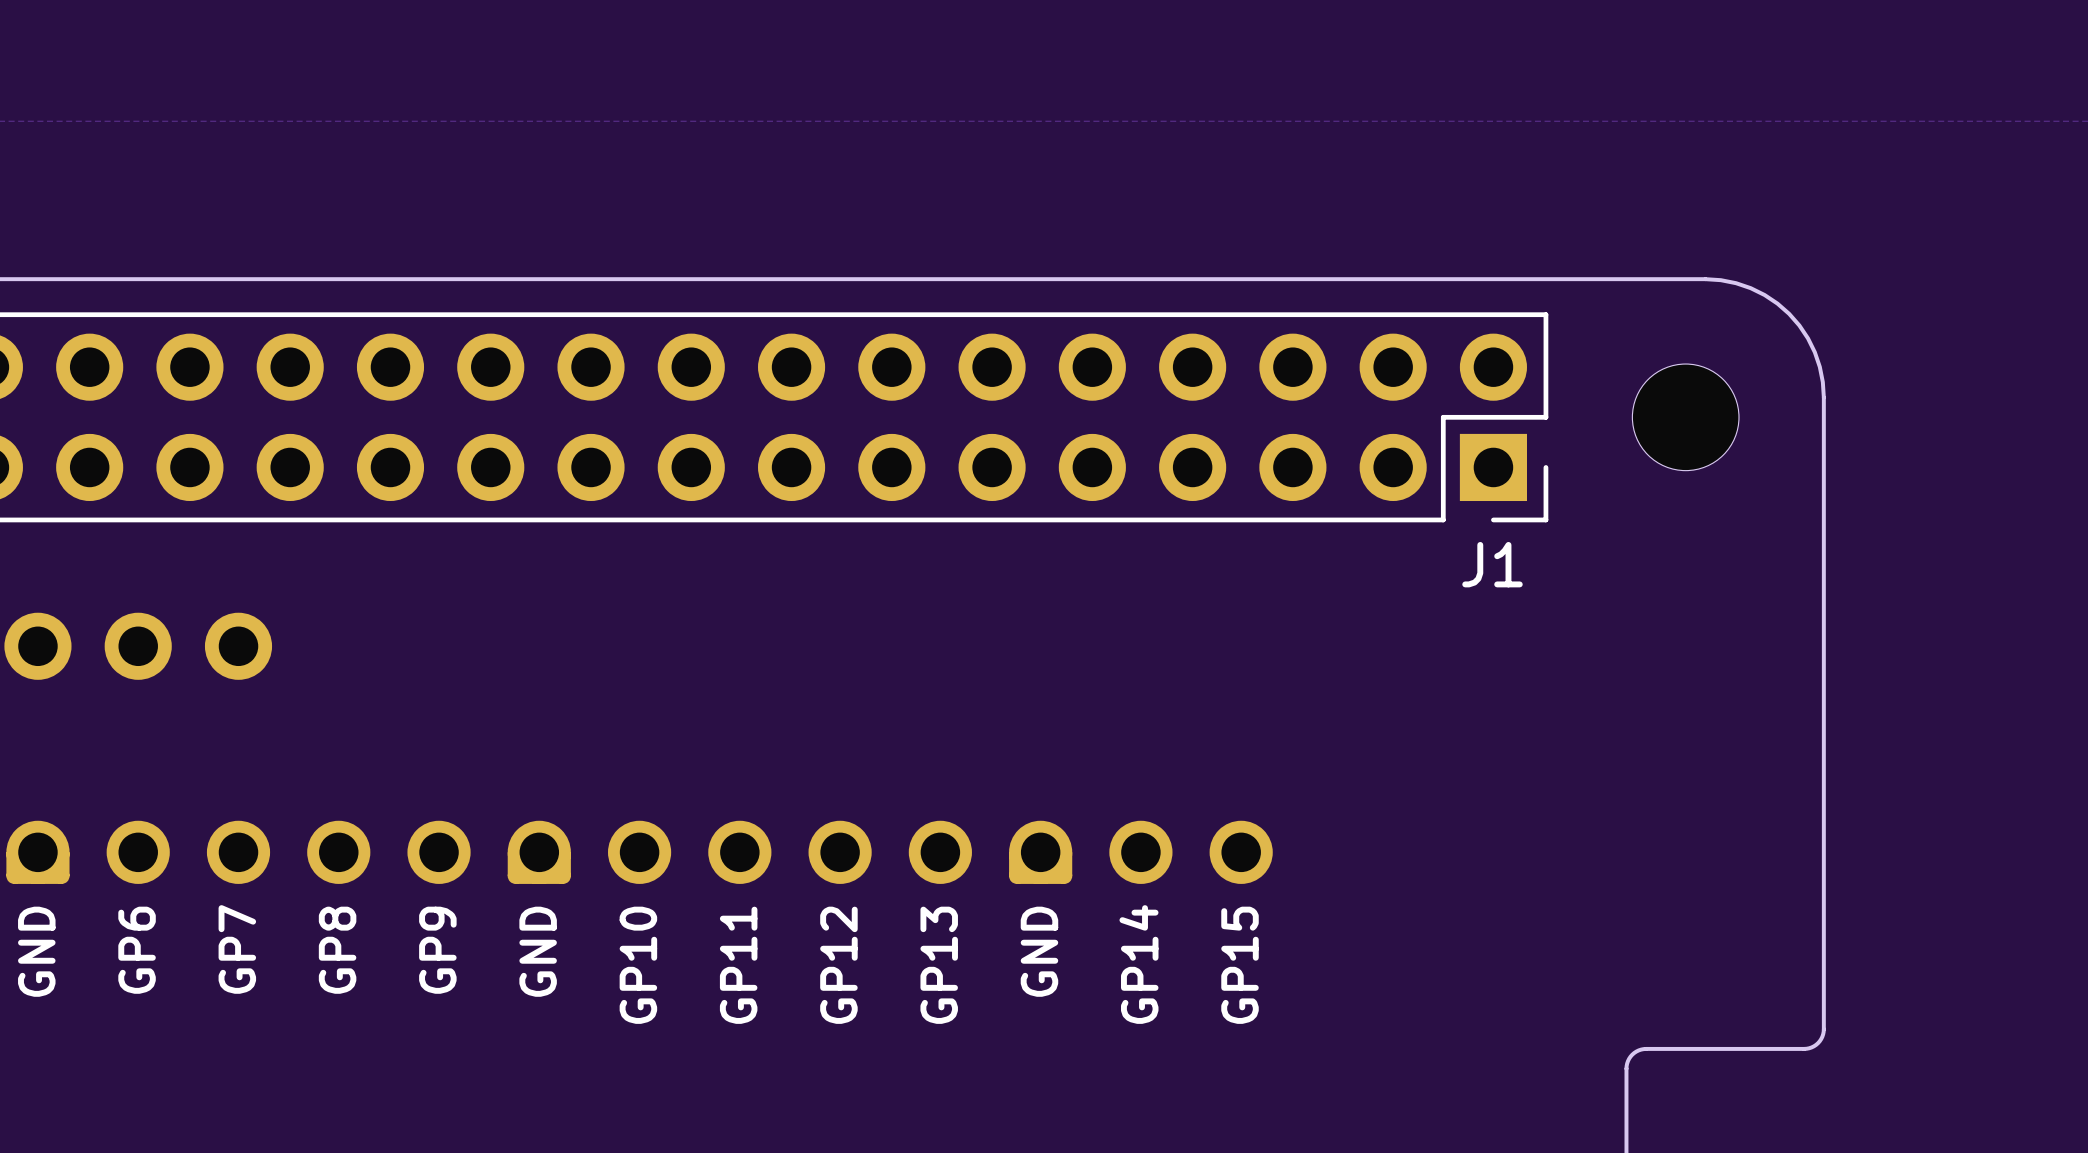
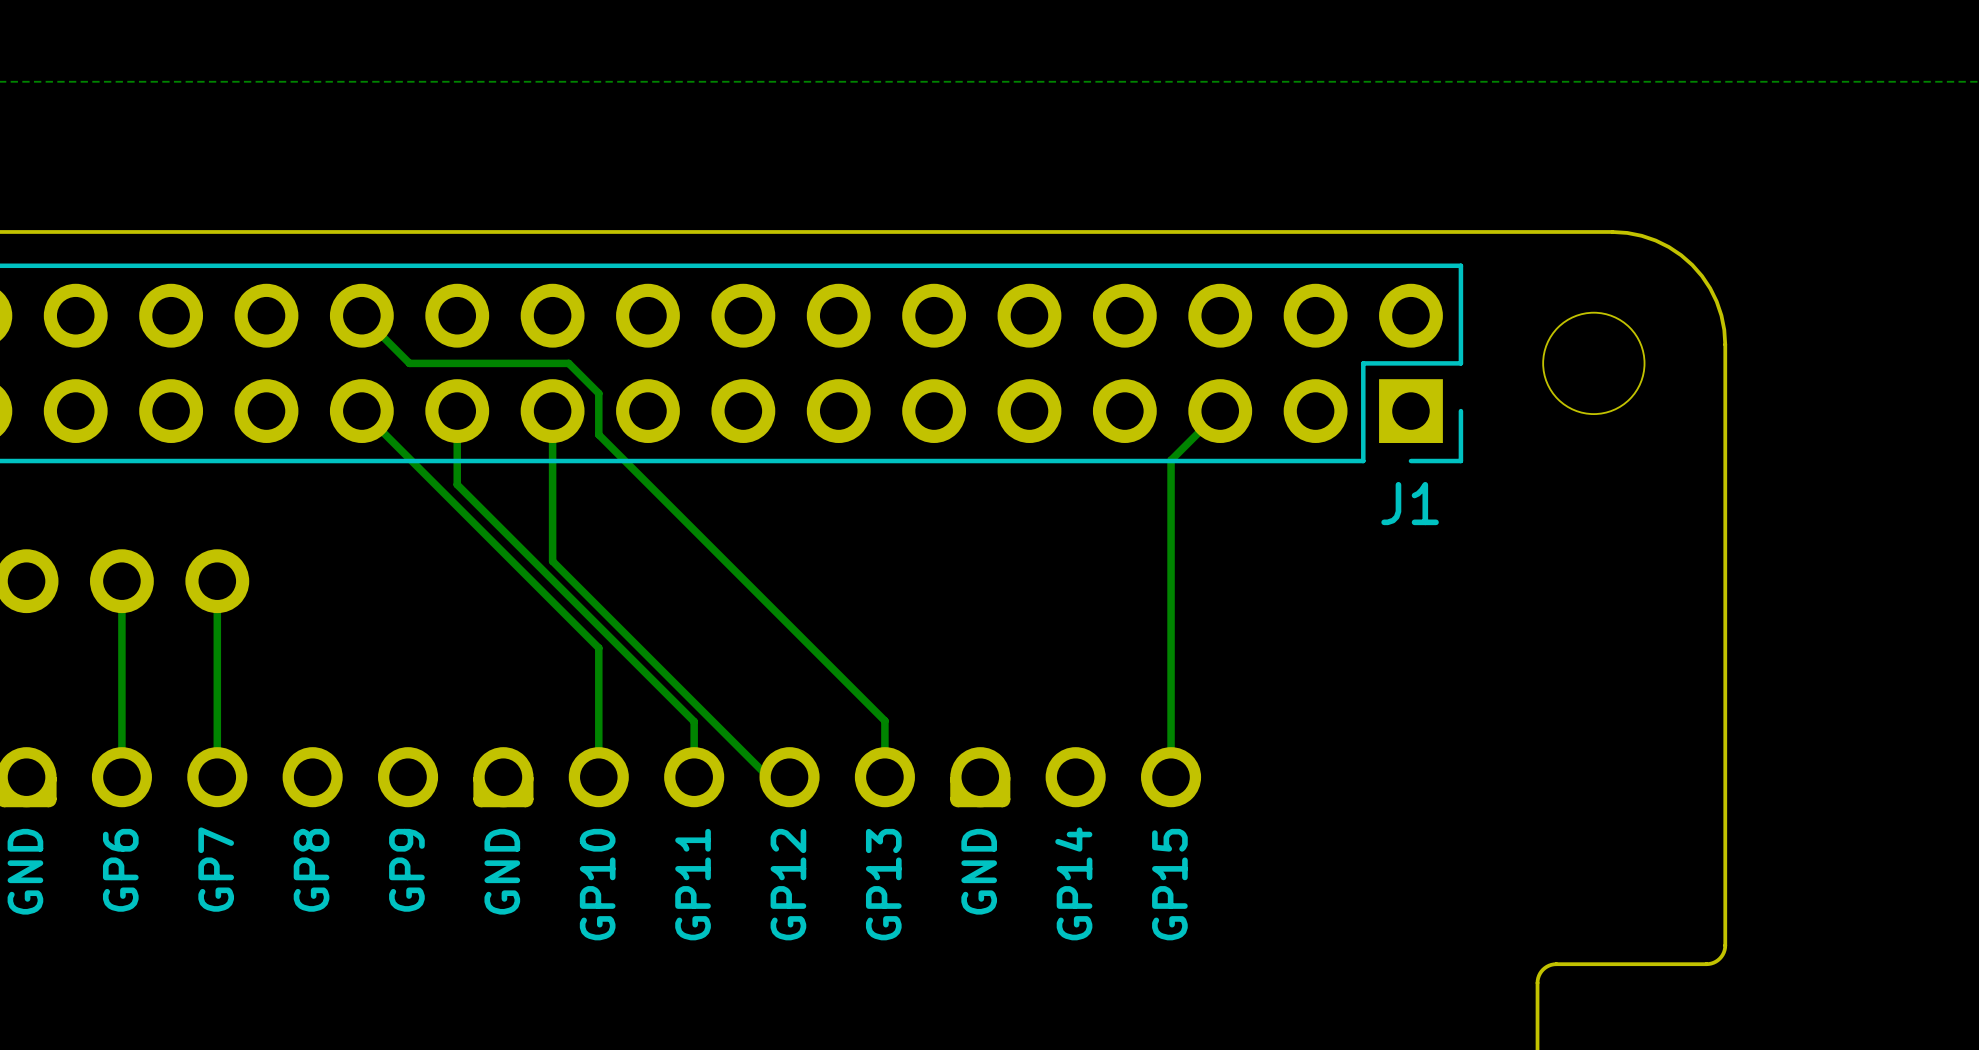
track: none -> (361, 315) (409, 363) (568, 363) (598, 393) (598, 434) (884, 720) (884, 777)
track: none -> (361, 411) (598, 648) (598, 777)
track: none -> (457, 411) (457, 484) (694, 721) (694, 777)
track: none -> (552, 411) (552, 561) (768, 777) (789, 777)
track: none -> (1220, 411) (1171, 460) (1171, 777)
track: none -> (121, 581) (121, 777)
track: none -> (217, 581) (217, 777)

